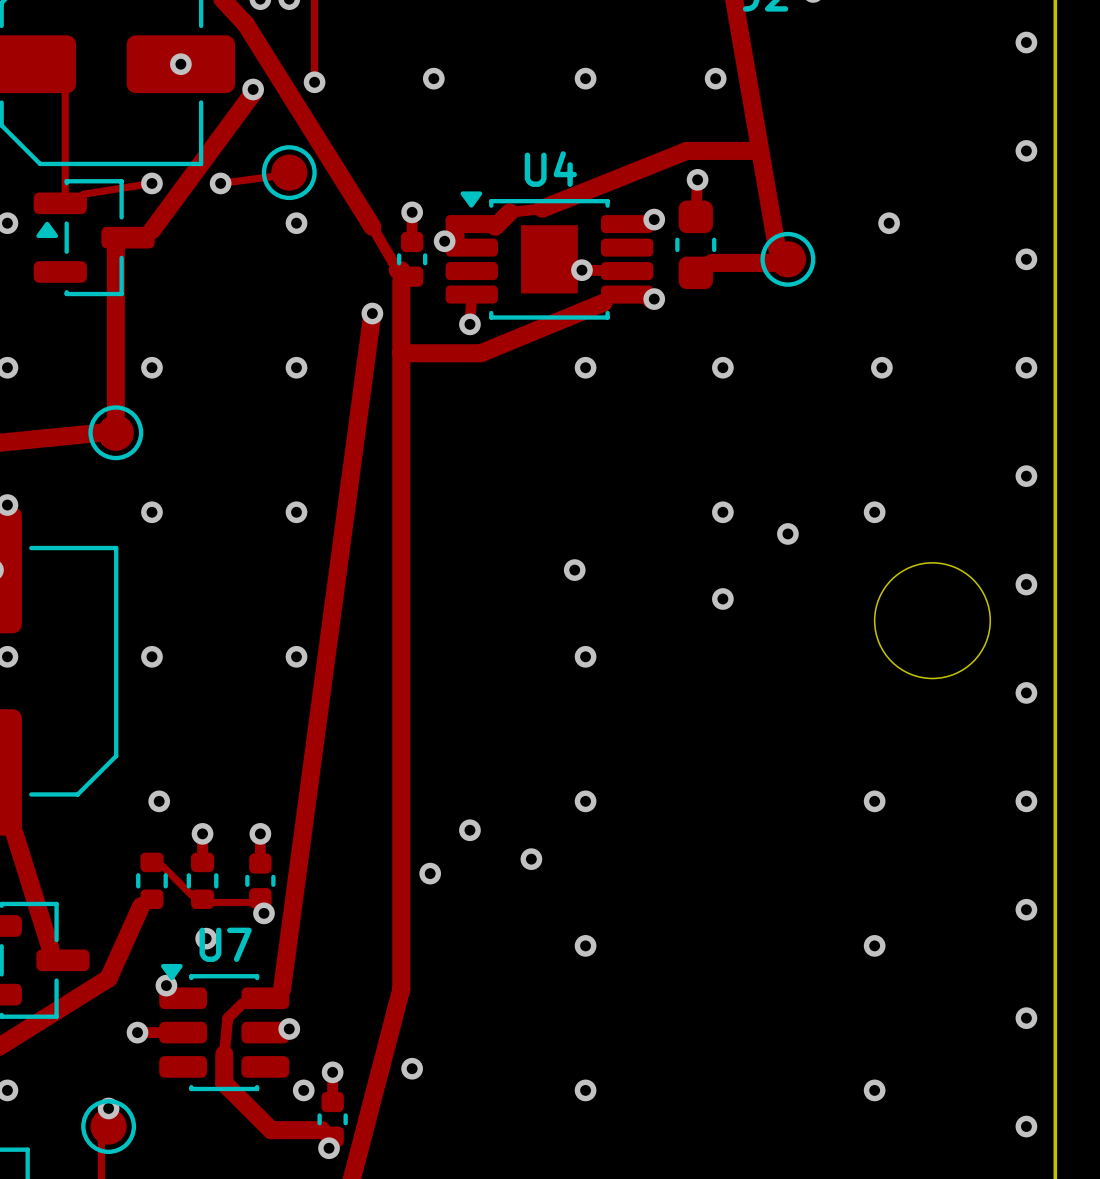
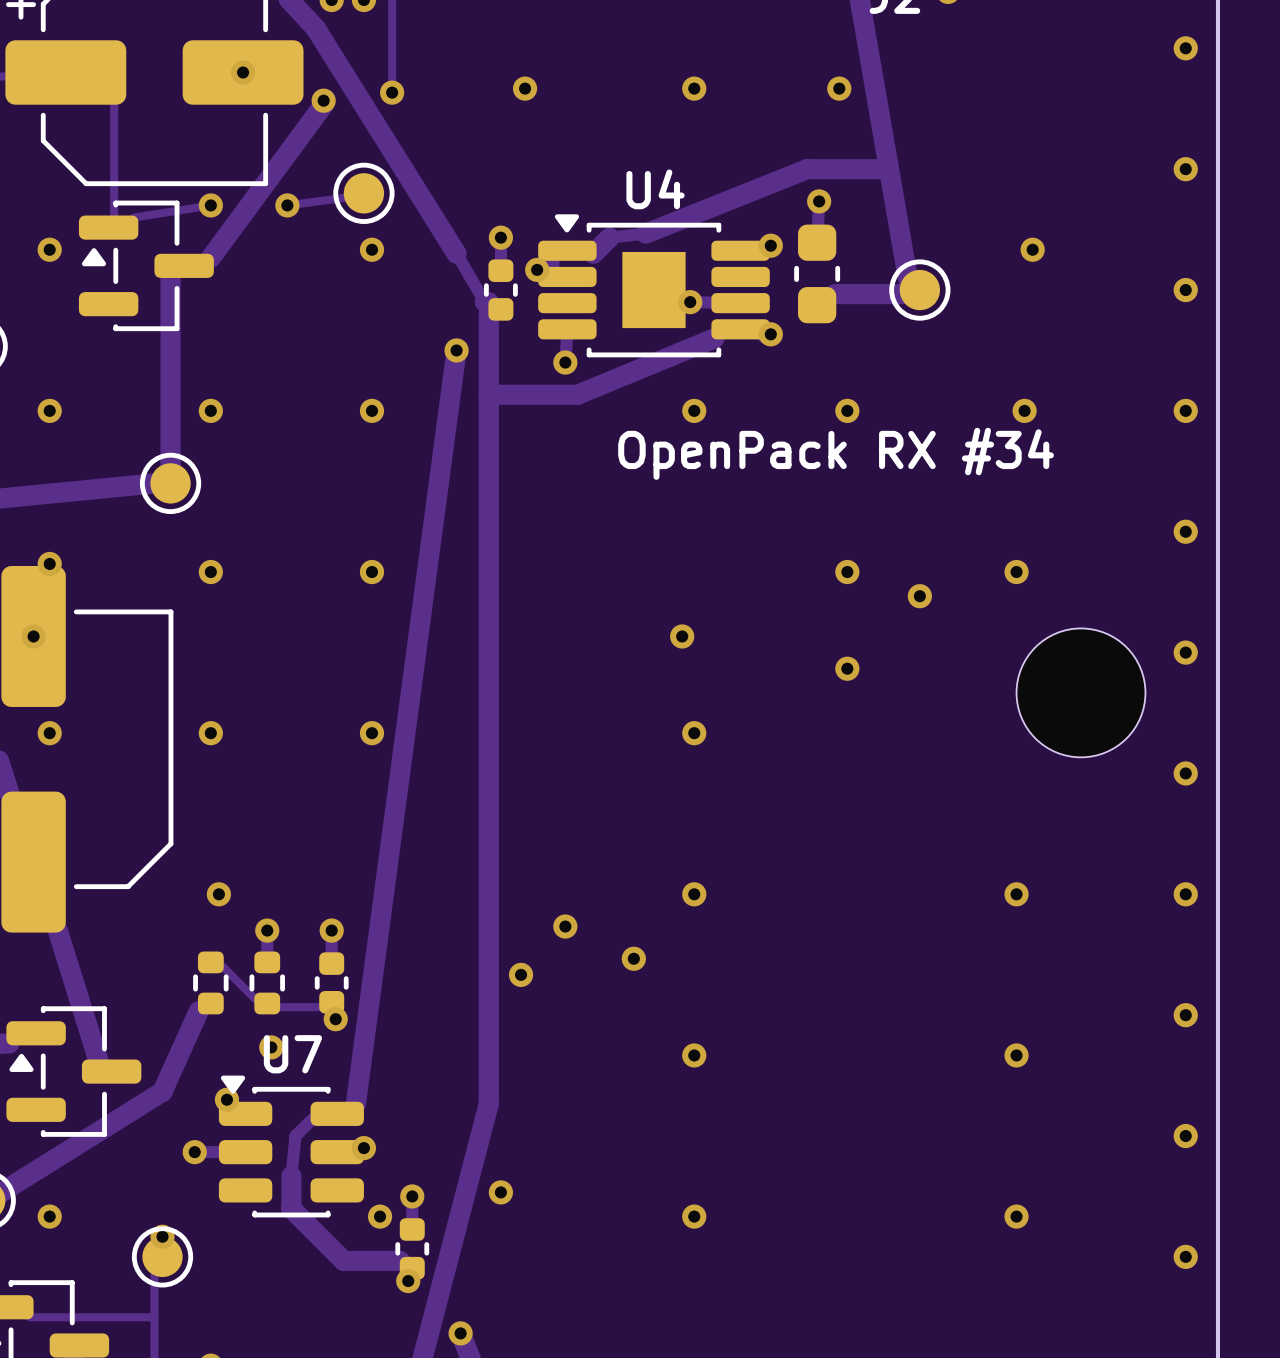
text: none -> OpenPack RX #34 (836, 453)

